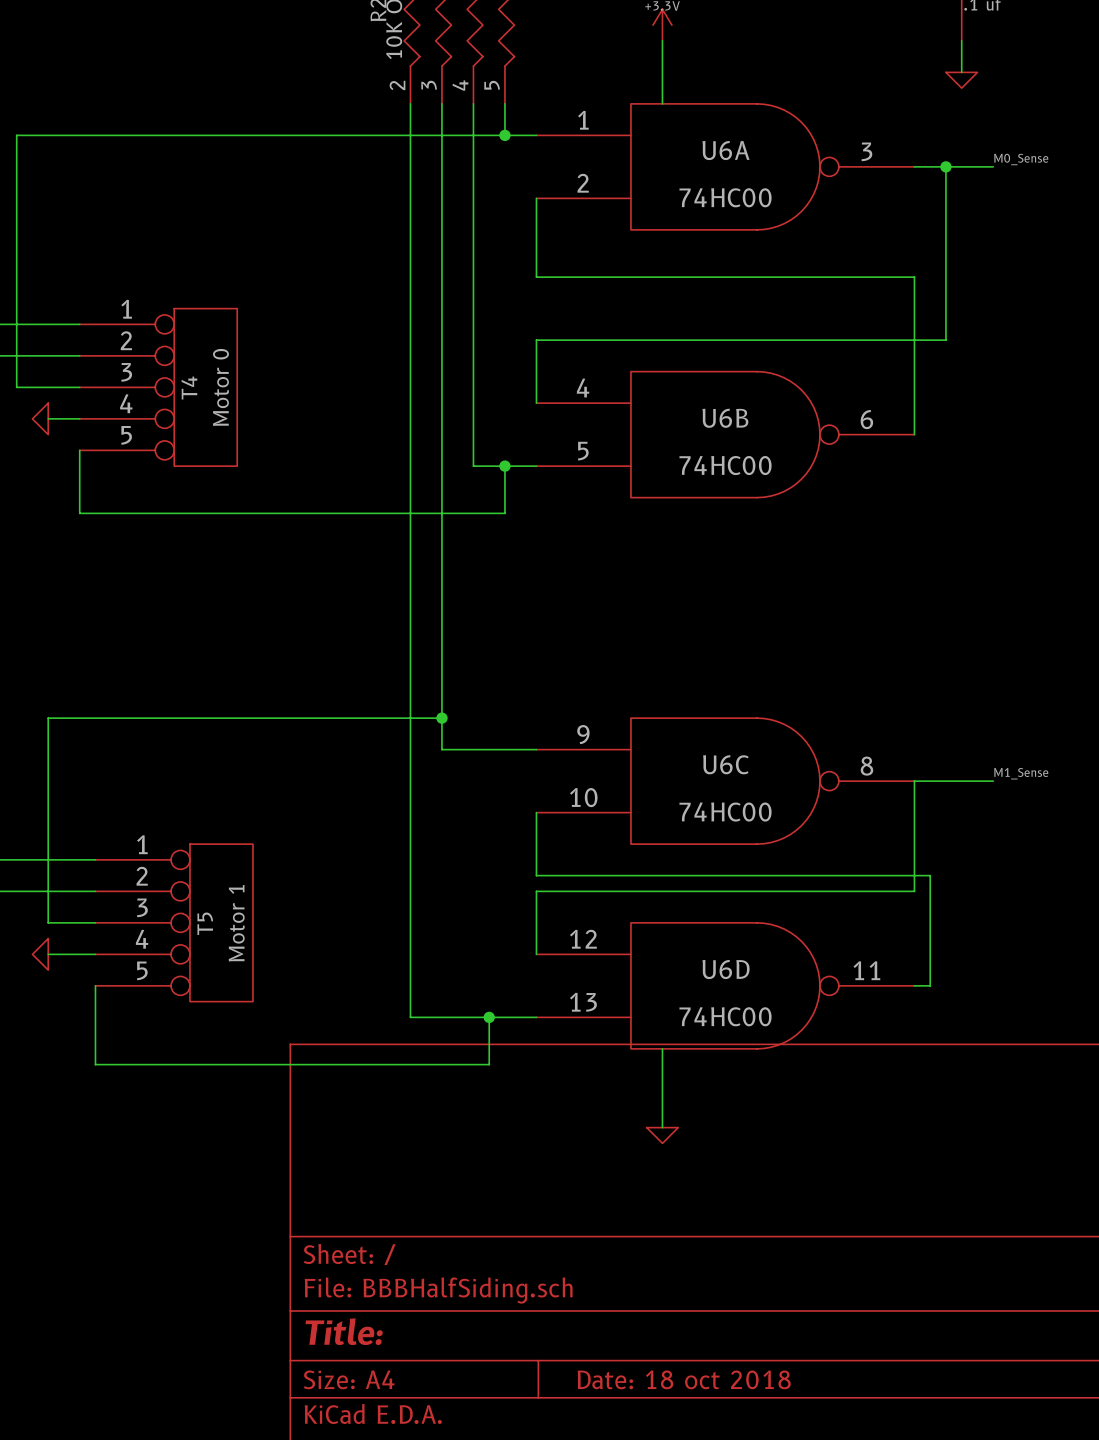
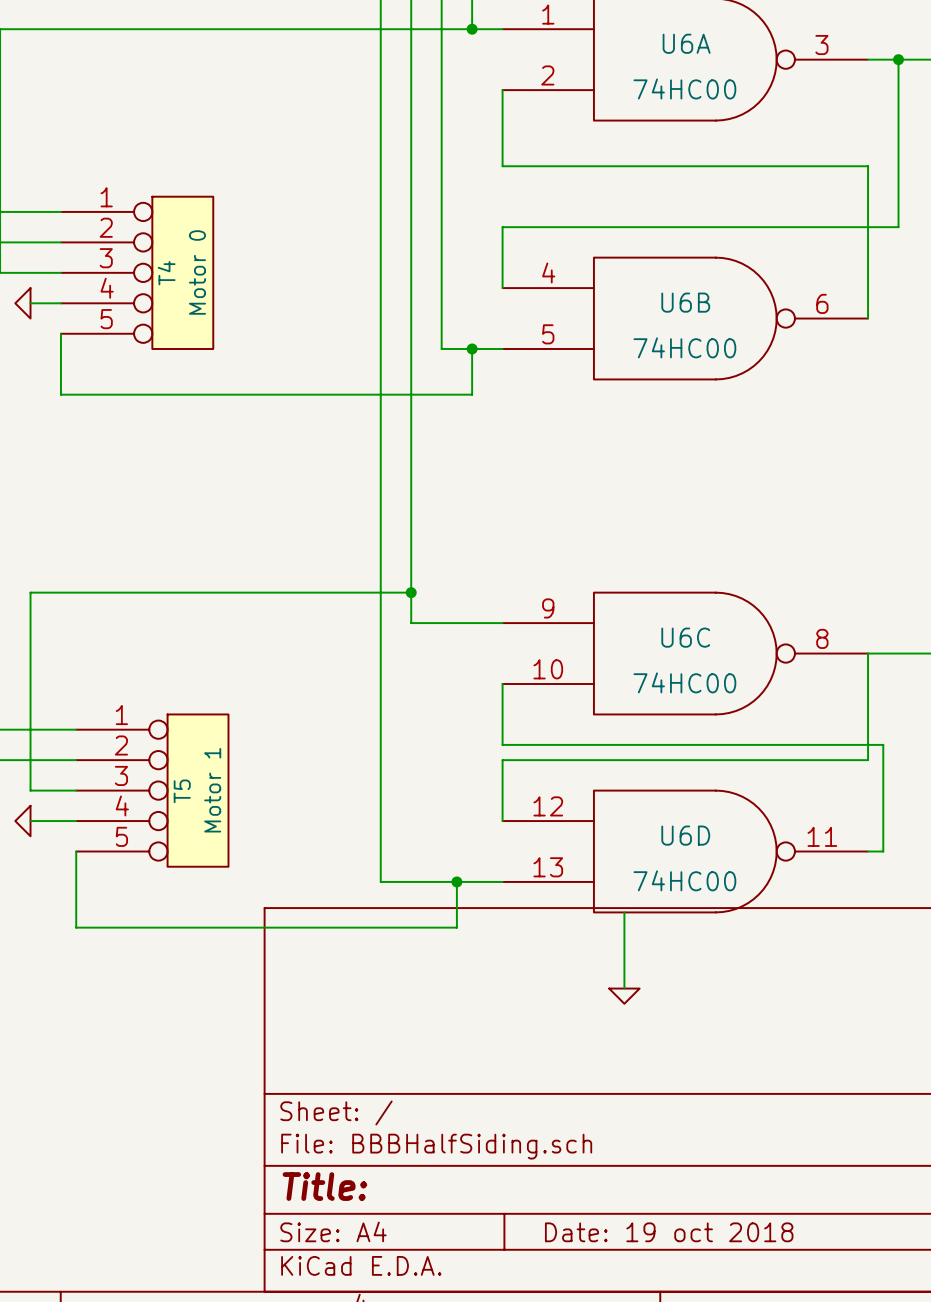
title block: Date: 18 oct 2018 (684, 1379) -> Date: 19 oct 2018 (669, 1232)

